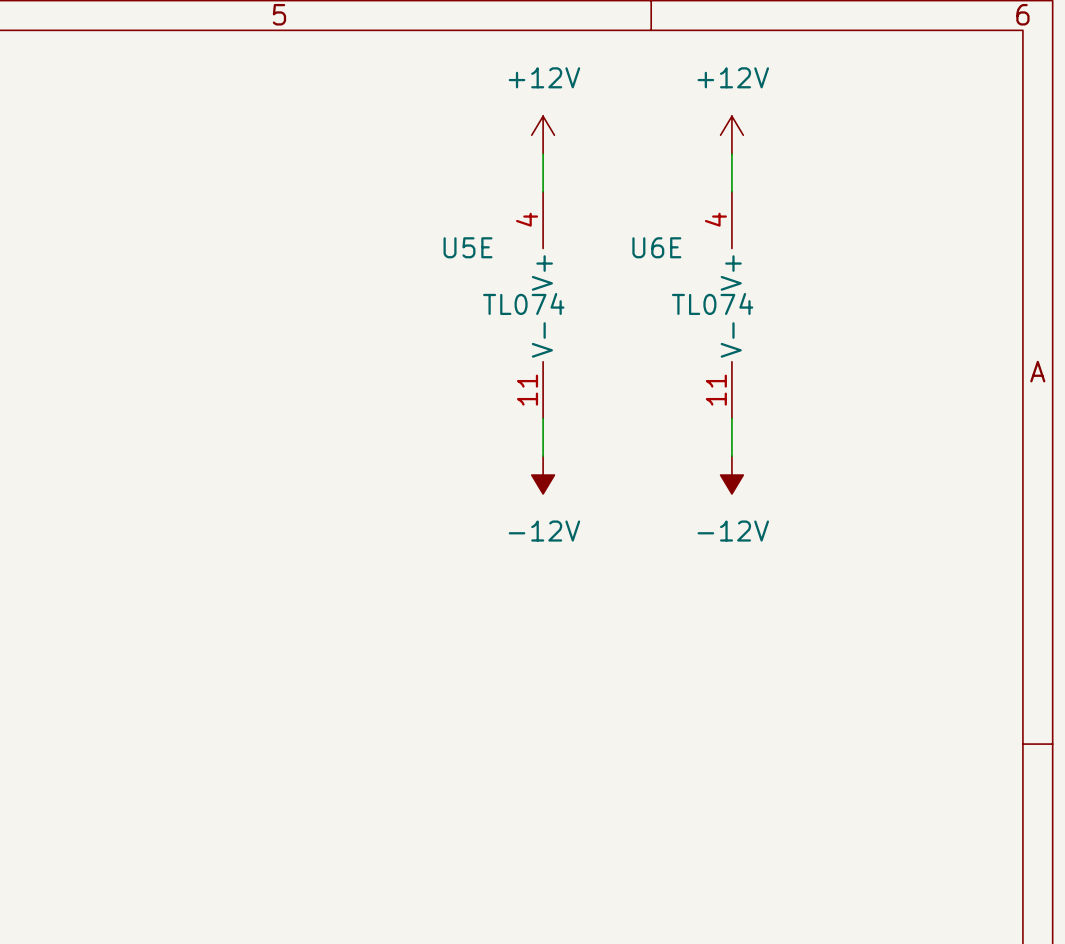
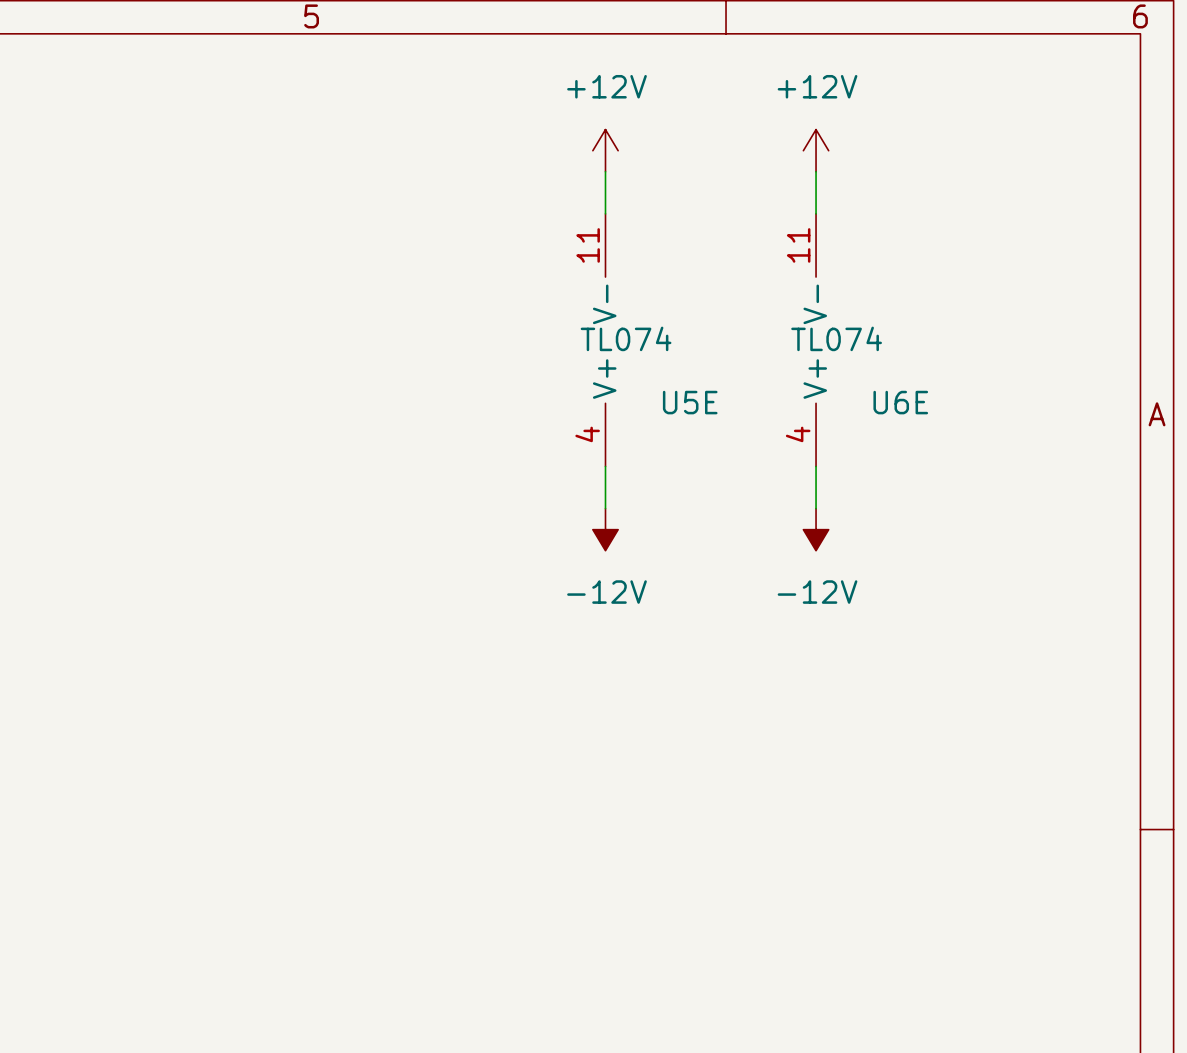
U5E rotation: 0° (543, 305) -> 180° (605, 340)
U6E rotation: 0° (731, 305) -> 180° (816, 340)

